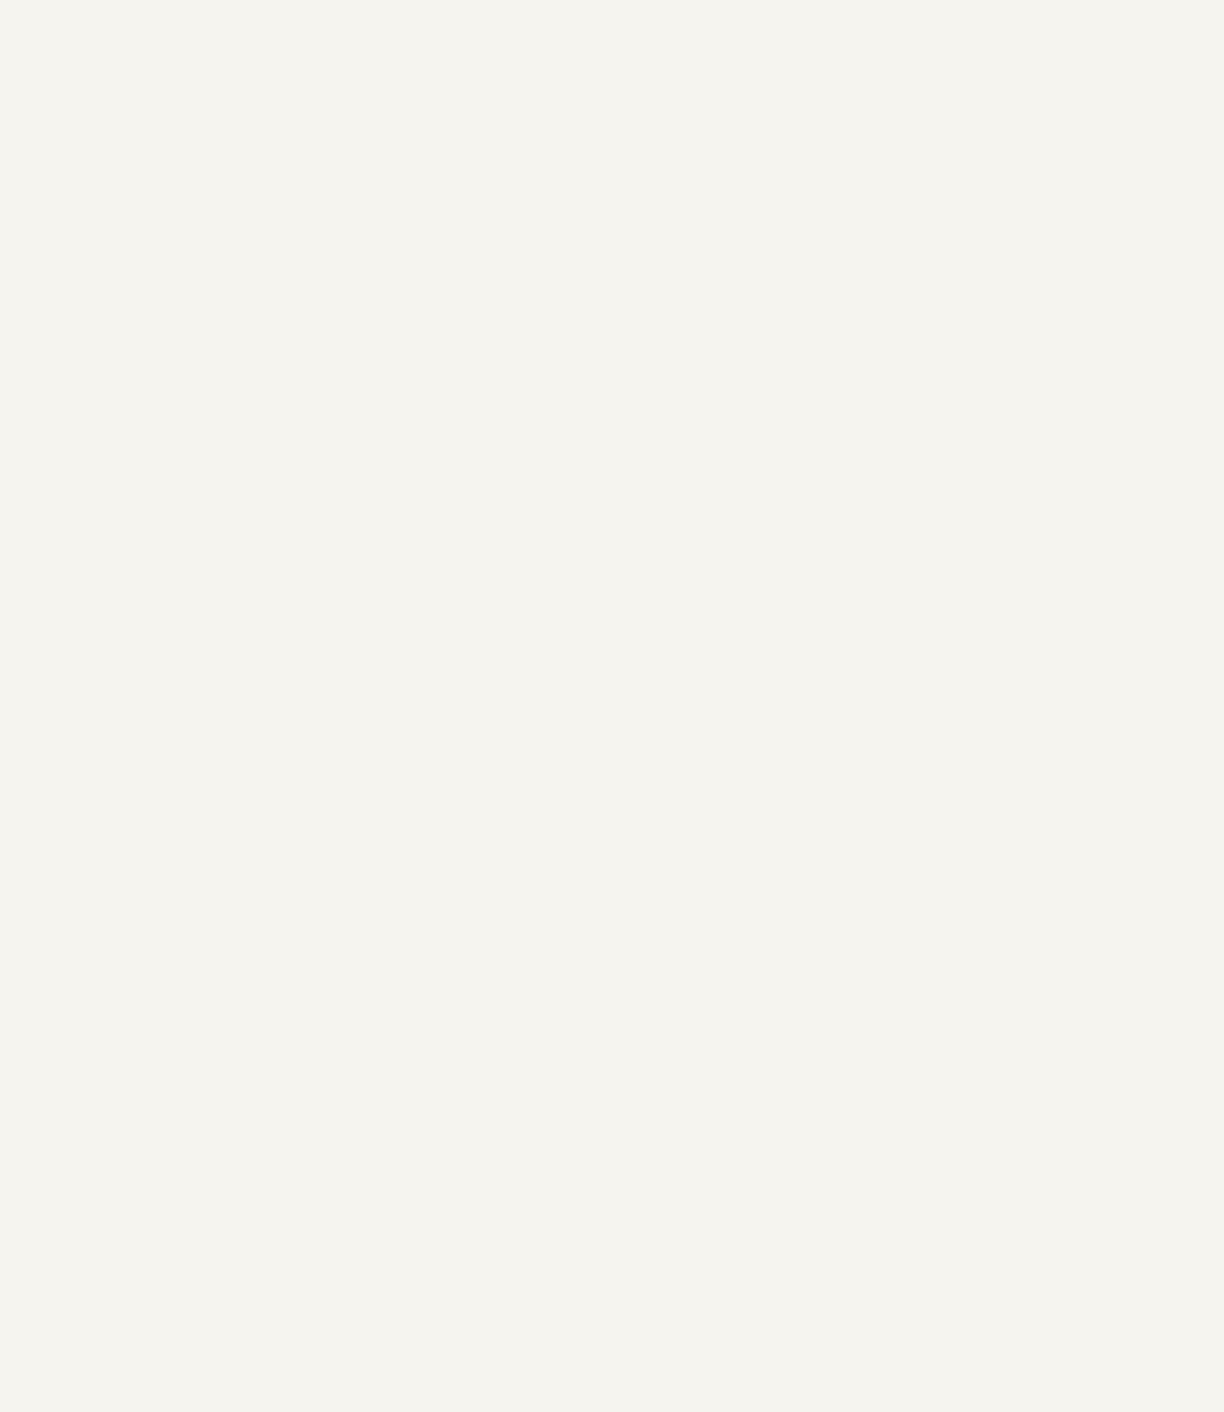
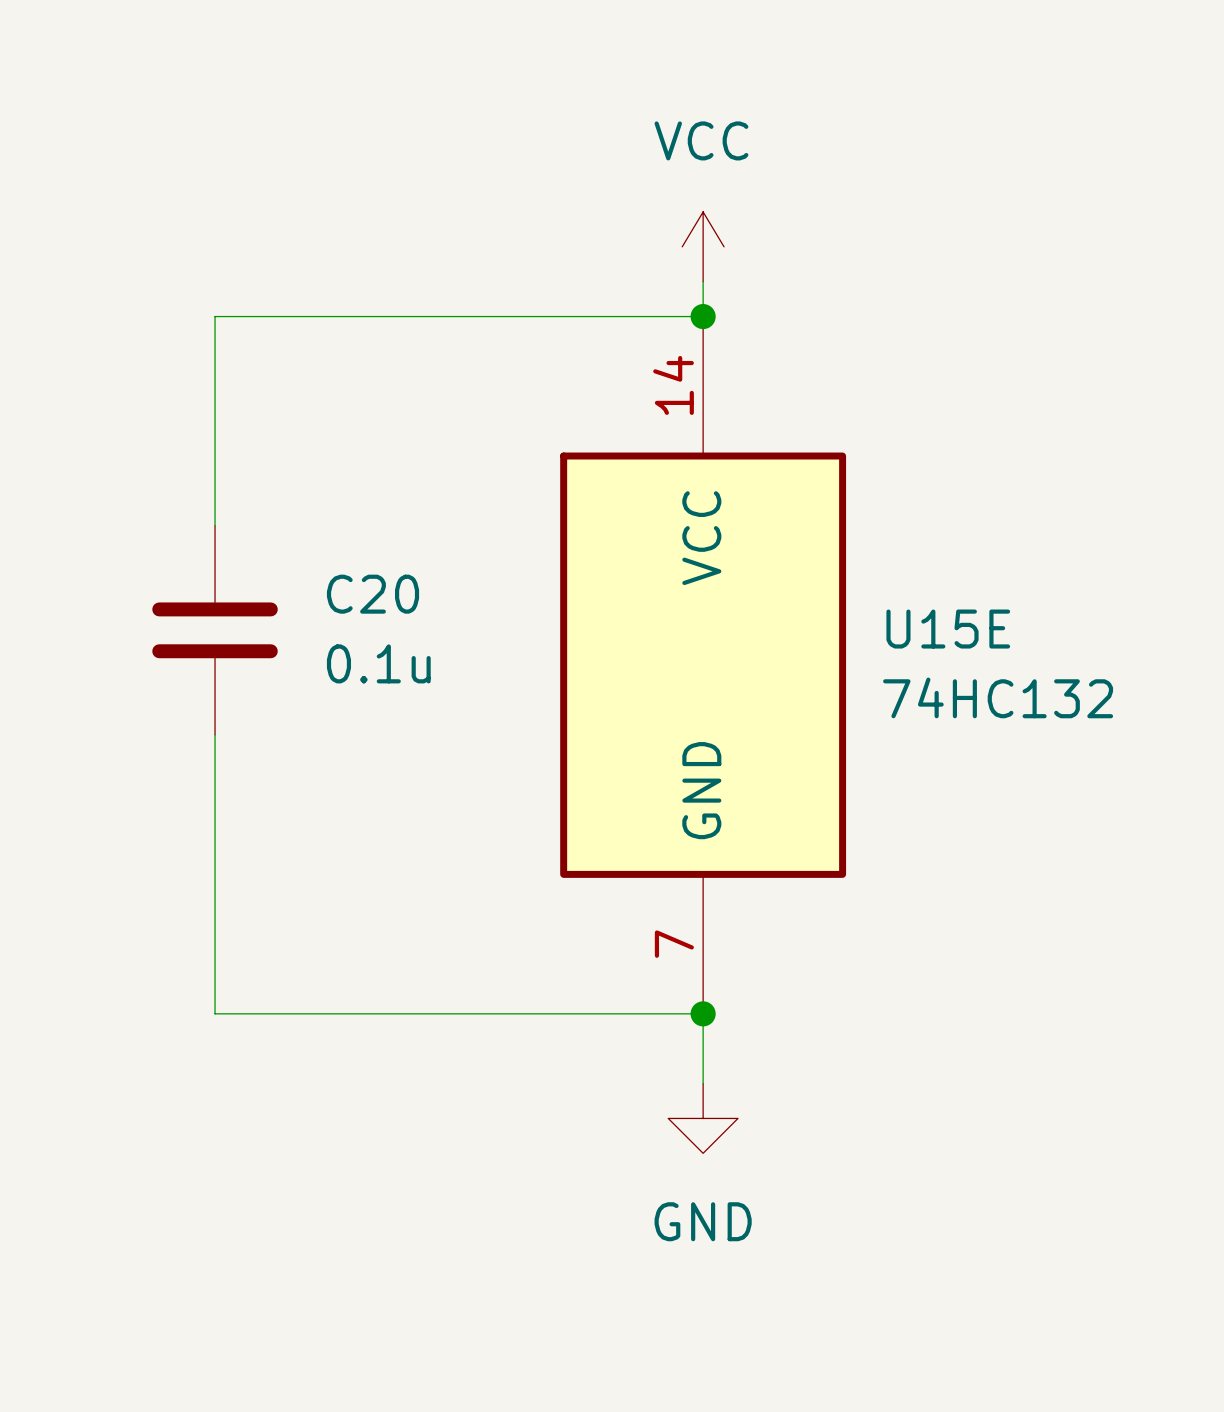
power symbol: none -> VCC (703, 246)
wire: none -> (703, 281) (703, 316) (215, 316) (215, 525)
junction: none -> (703, 316)
C20: none -> 0.1u (215, 630)
U15E: none -> 74HC132 (703, 665)
wire: none -> (215, 734) (215, 1013) (703, 1013) (703, 1083)
junction: none -> (703, 1013)
power symbol: none -> GND (703, 1118)

